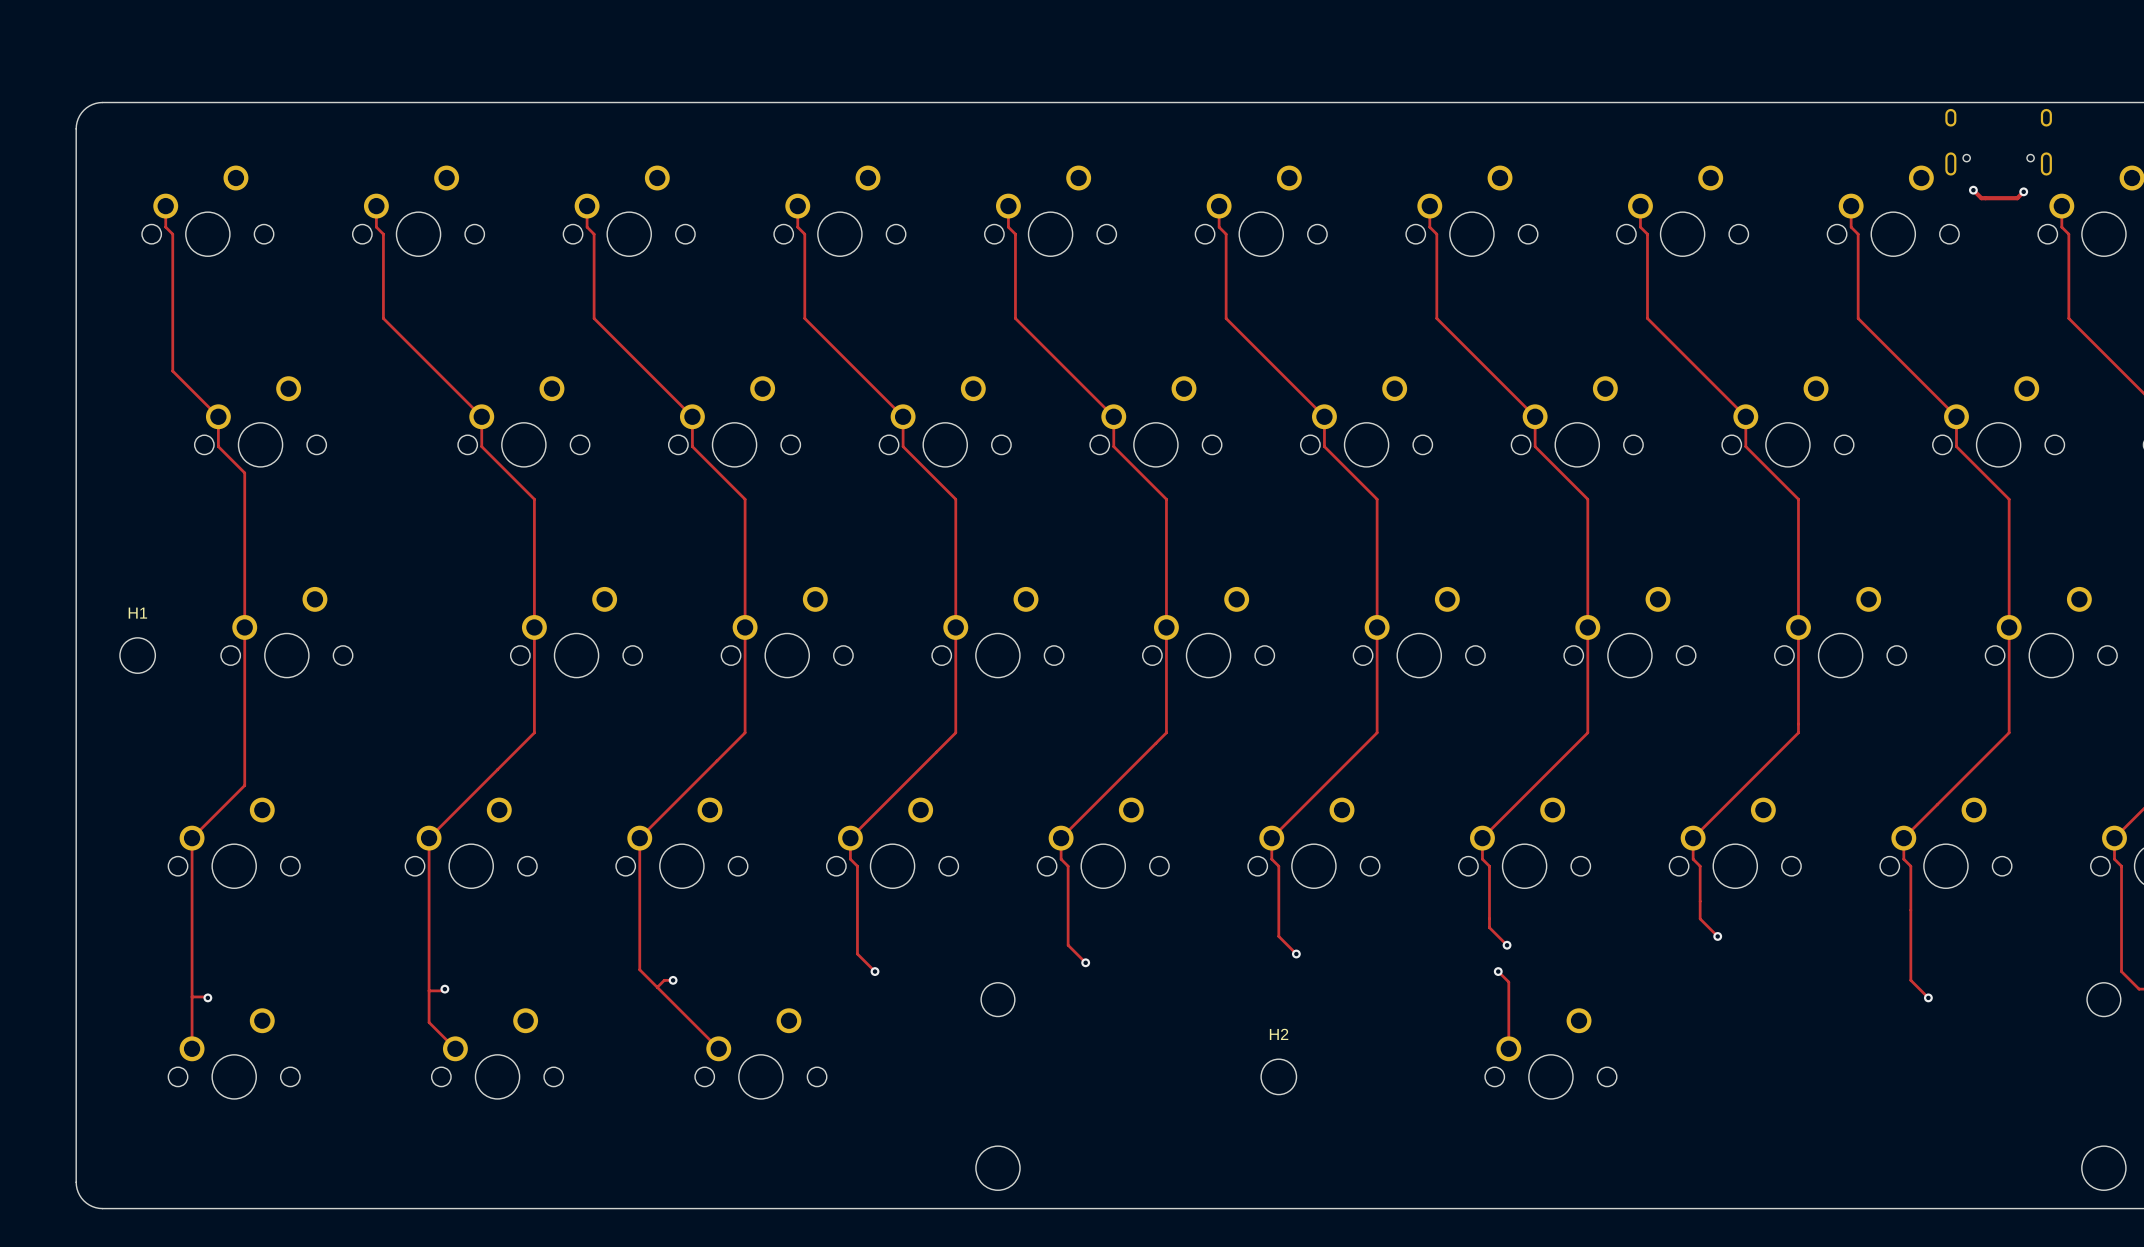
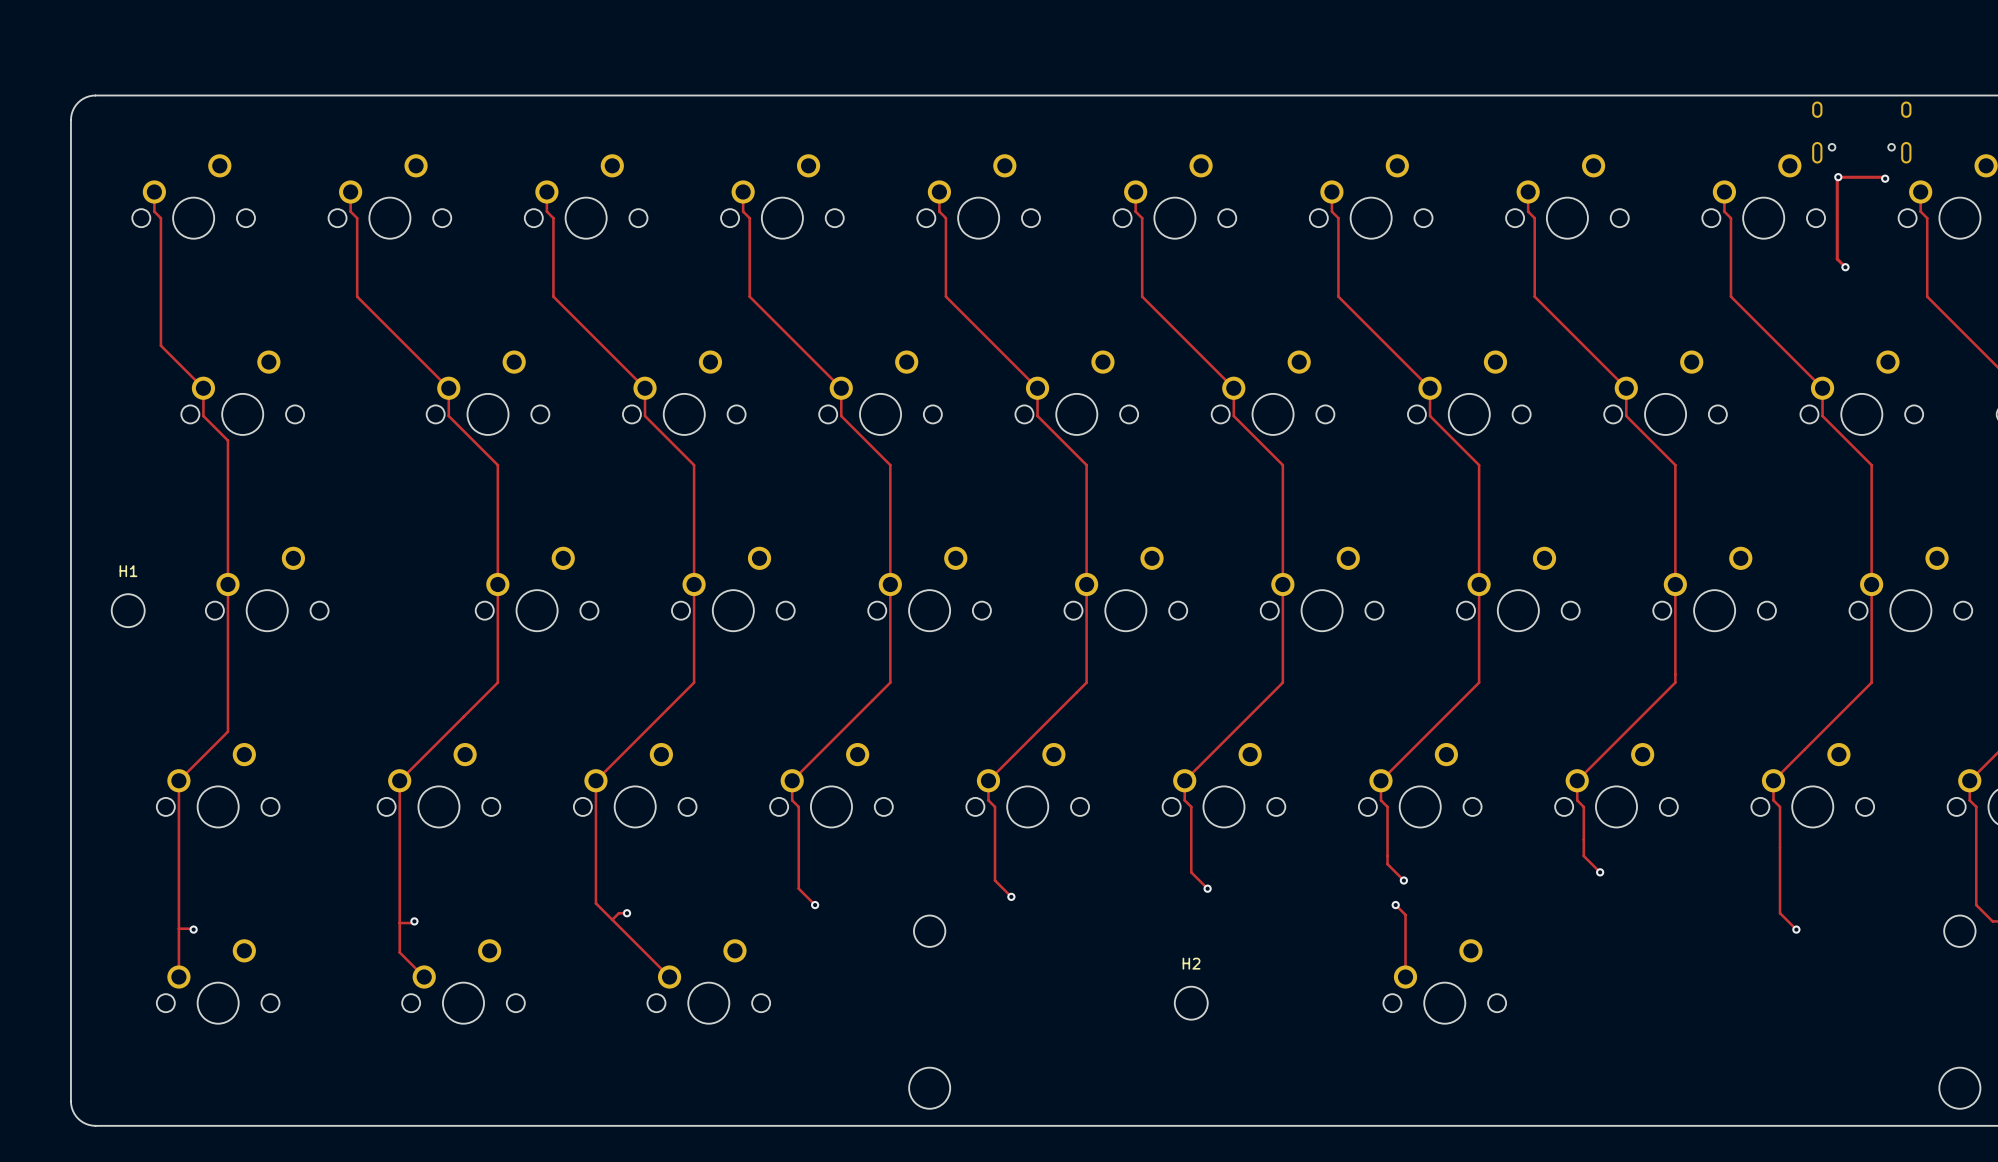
track: none -> (1837, 177) (1837, 259) (1845, 267)
track: none -> (1837, 177) (1886, 177)
track: (1973, 190) (1981, 198) (2017, 198) (2023, 191) -> none
via: none -> (1845, 267)

